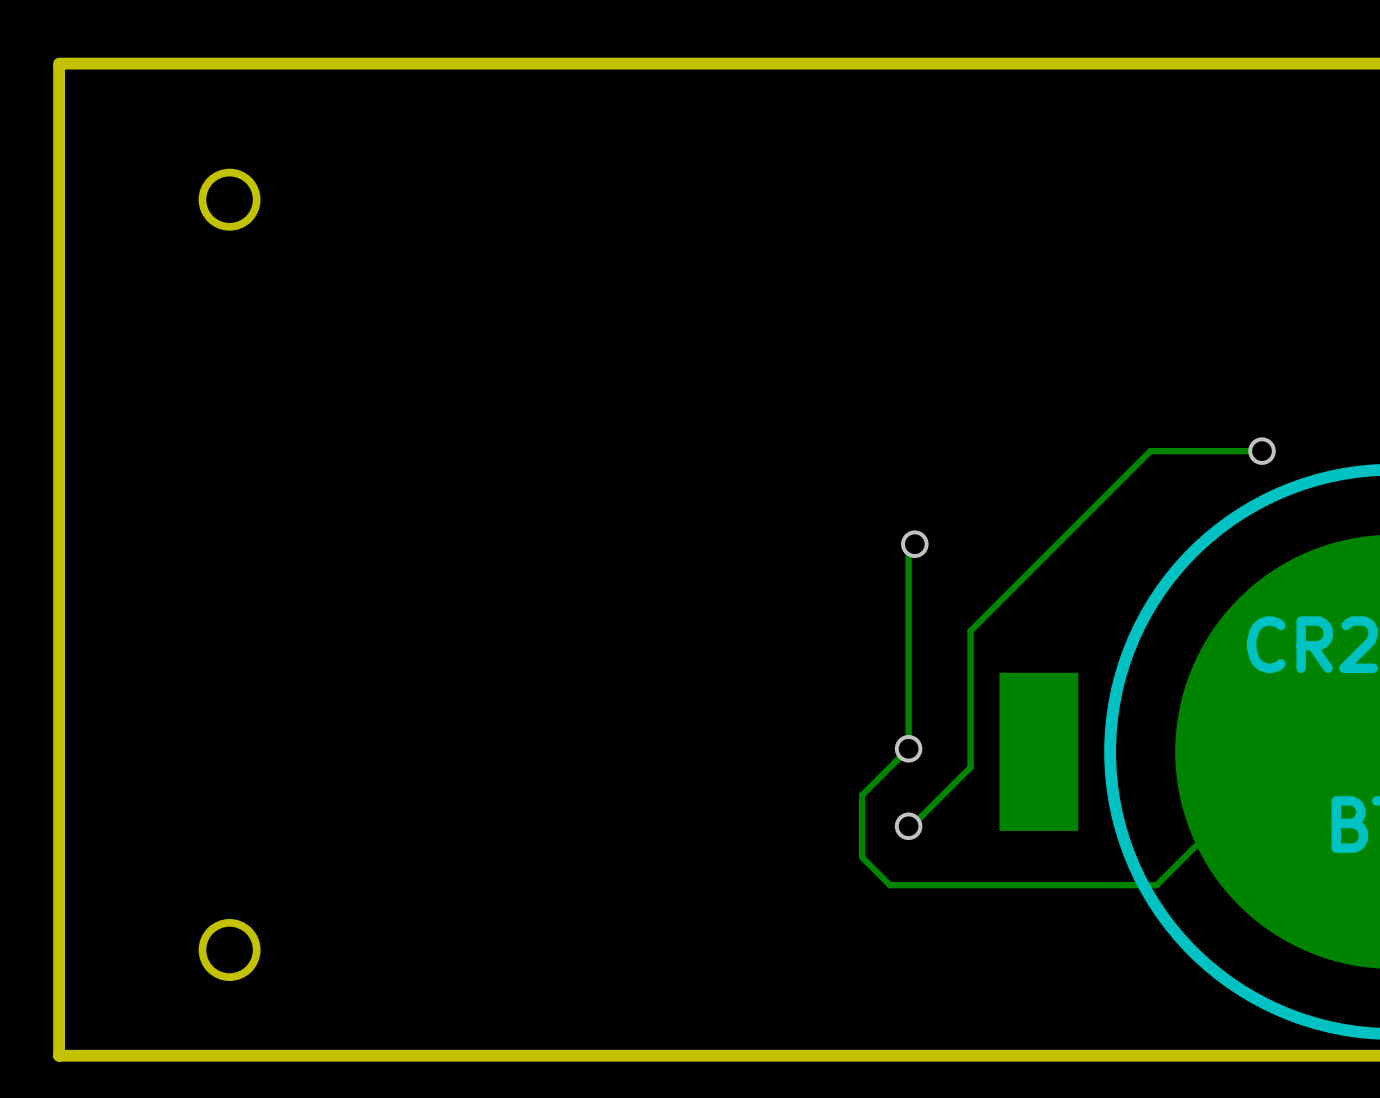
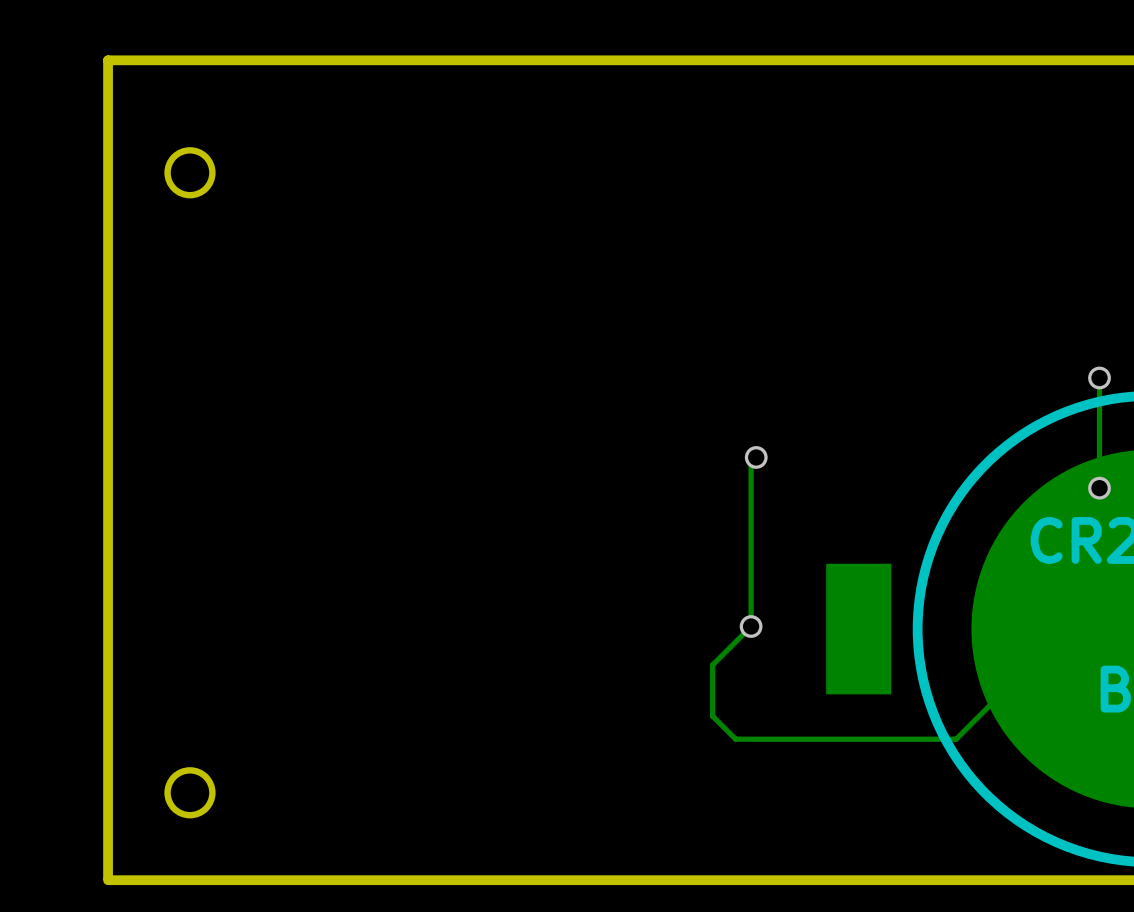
board edge: (130, 63) (59, 63) -> (108, 60) (108, 877)
board edge: (59, 66) (59, 1055) (130, 1055) -> none
track: none -> (1099, 378) (1099, 488)
track: (1262, 451) (1150, 451) (970, 630) (970, 767) (911, 826) (908, 826) -> none
via position: (1262, 451) -> (1099, 378)
via: none -> (1099, 488)
via: (908, 826) -> none

